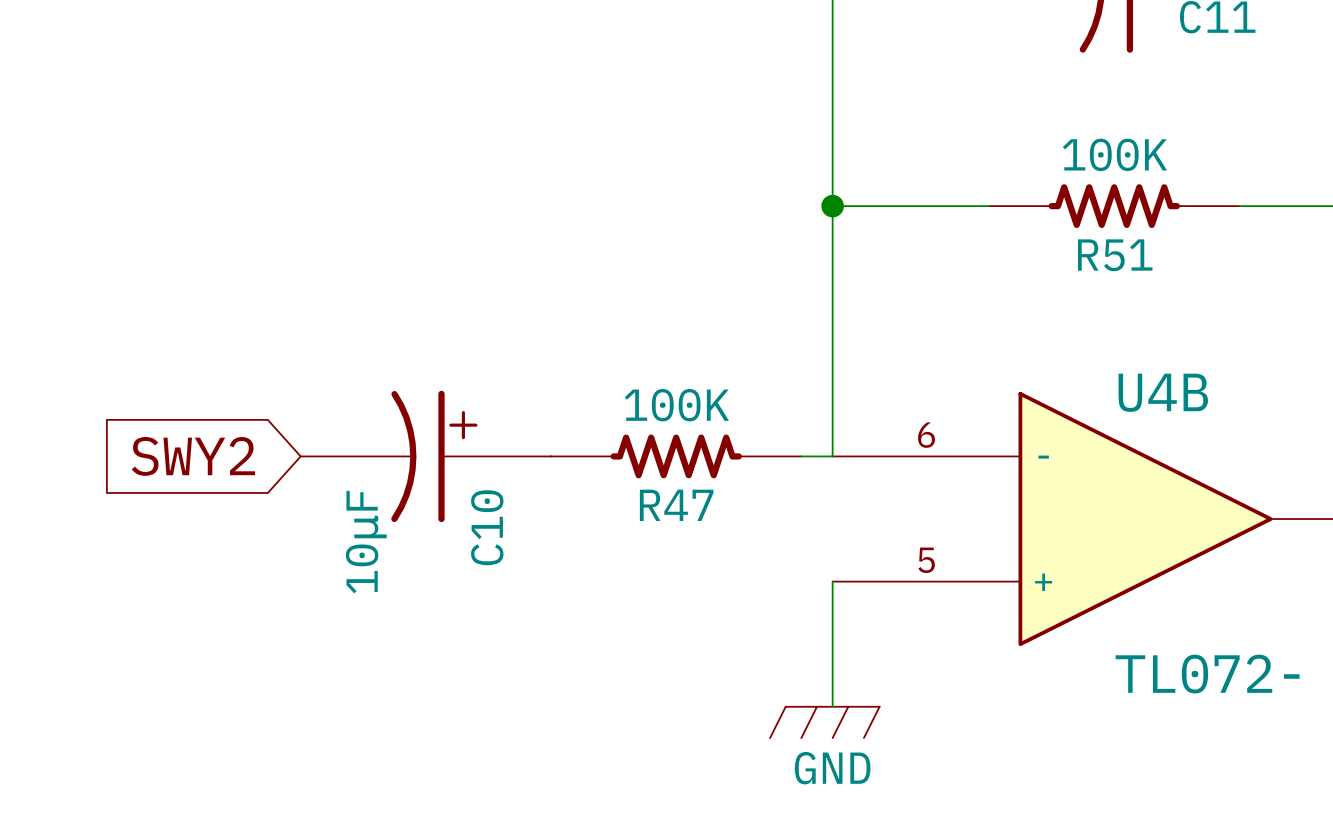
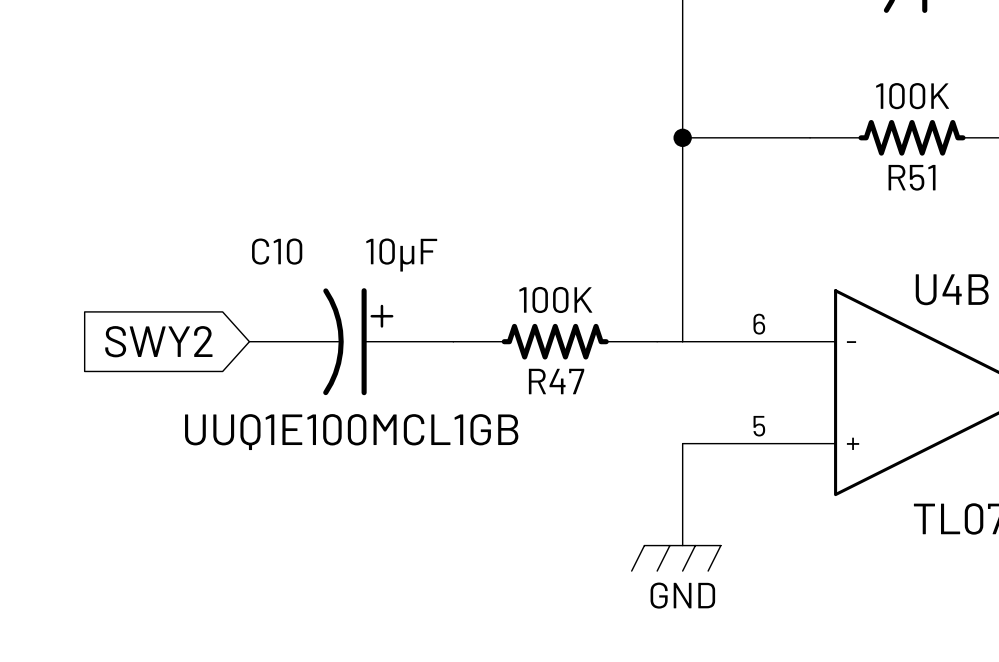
C10 name rotation: 0° (487, 527) -> 90° clockwise (277, 251)
C10 name position: C10 (487, 527) -> C10 (277, 251)
C10 value rotation: 0° (366, 542) -> 90° clockwise (401, 255)
C10 value position: 10μF (366, 542) -> 10μF (401, 255)
C10 text: none -> UUQ1E100MCL1GB (351, 432)

